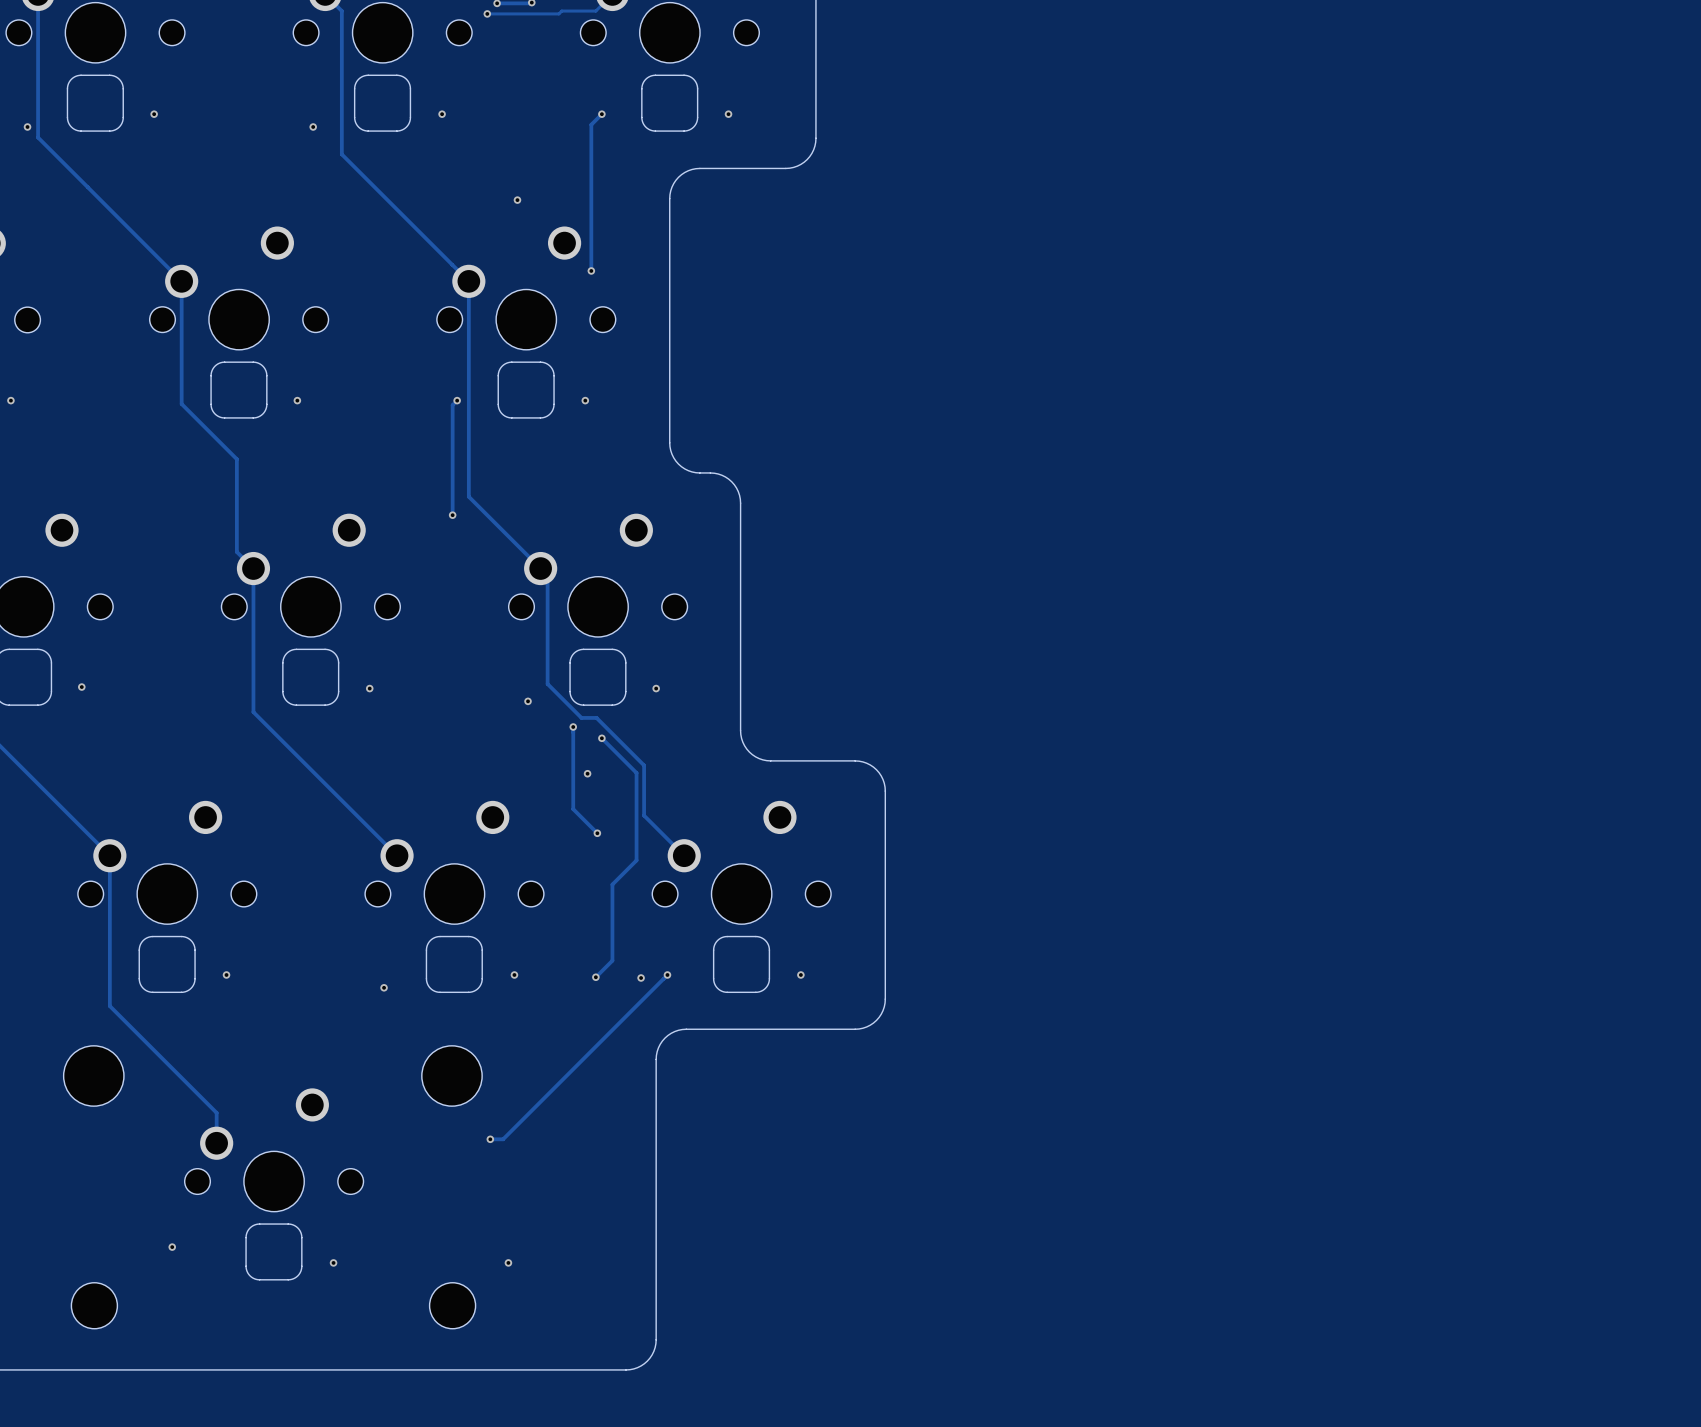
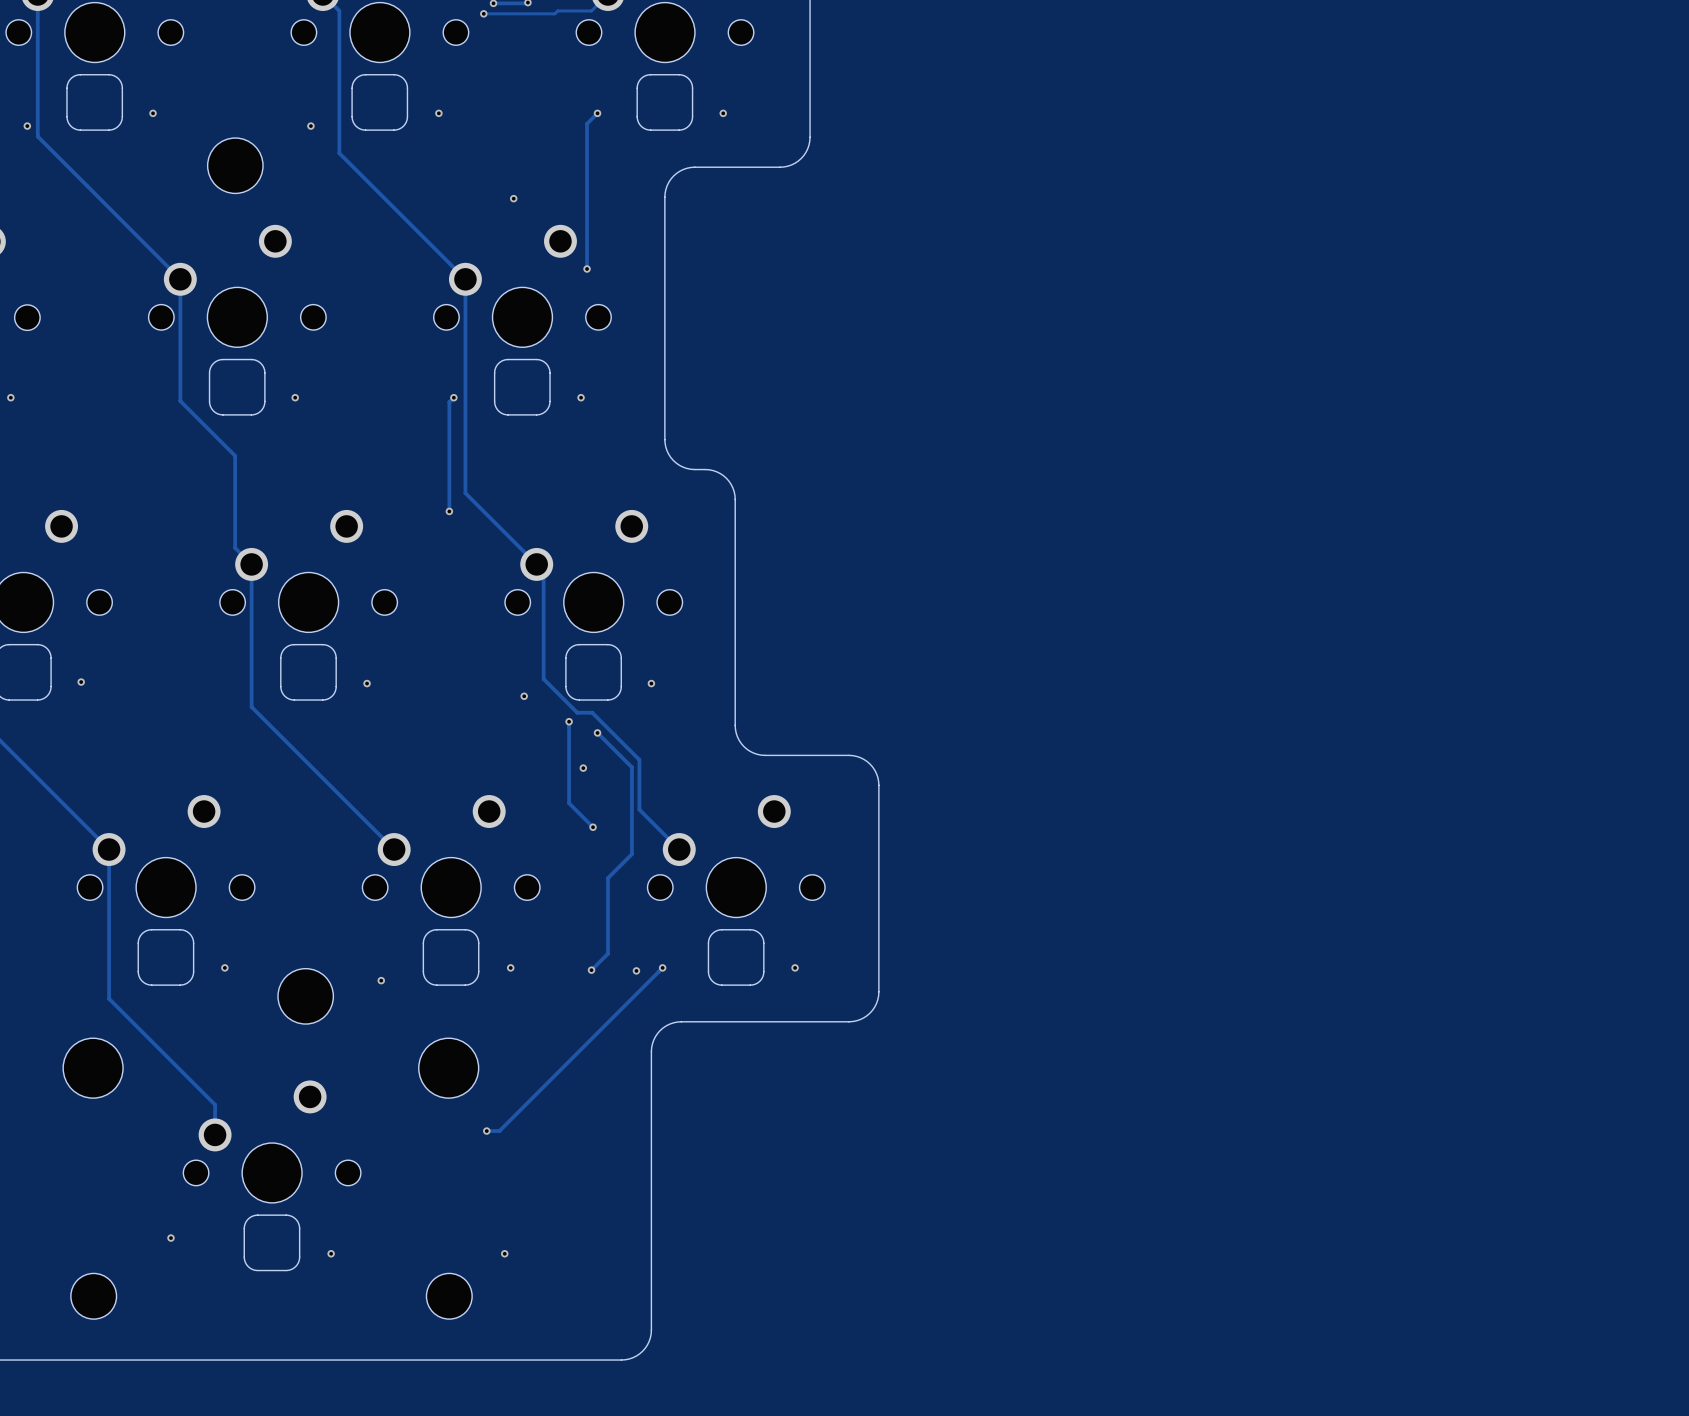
part: none -> (235, 165)
part: none -> (305, 996)

